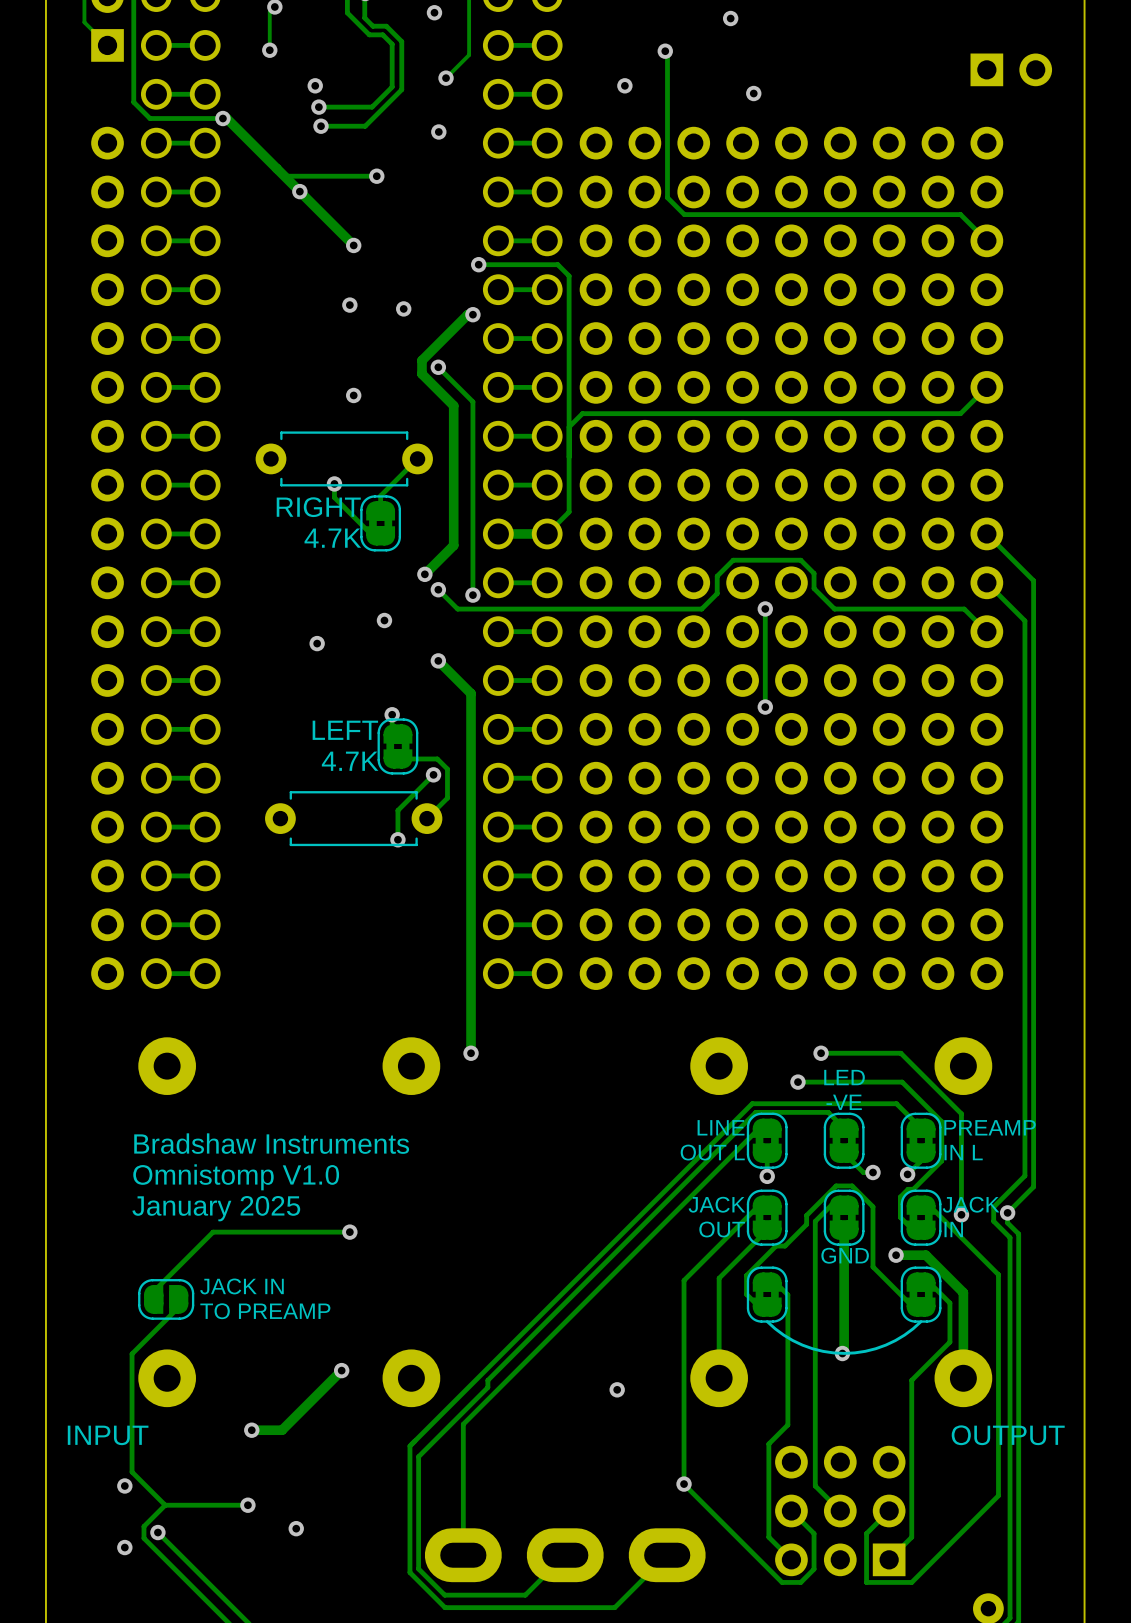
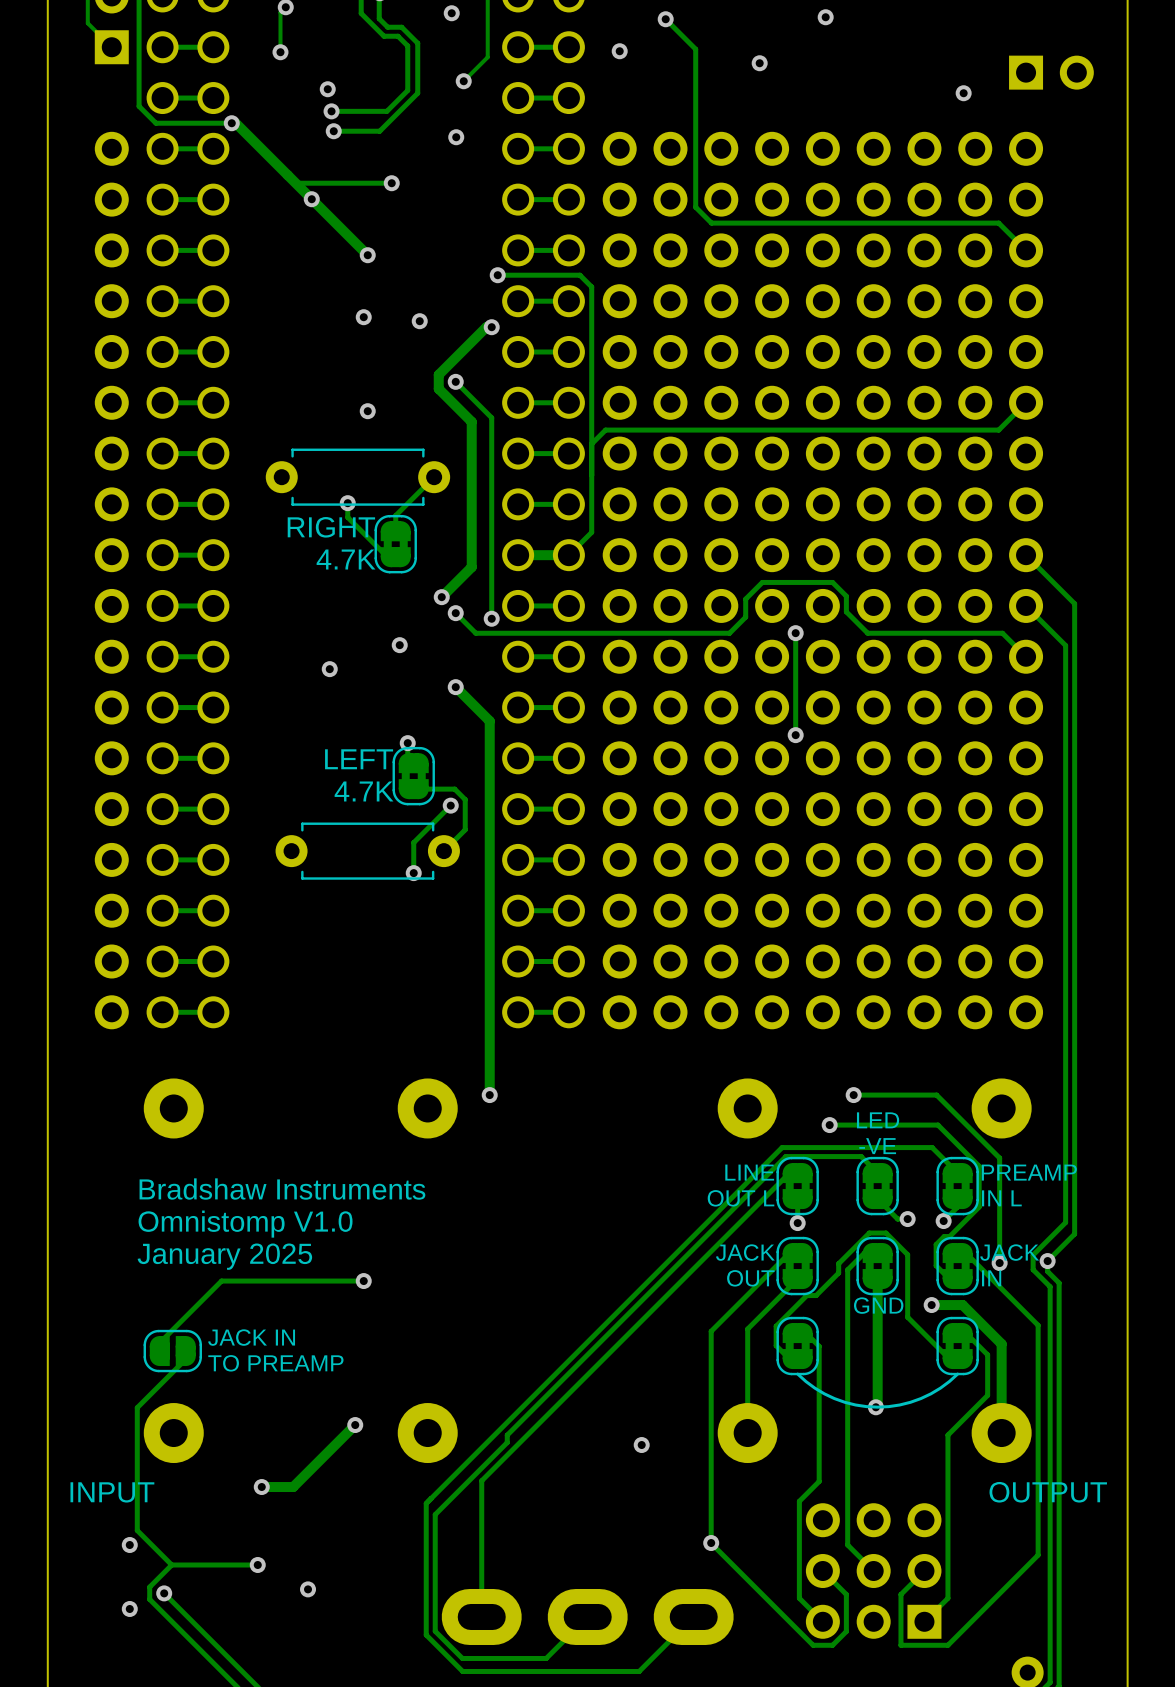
via: none -> (825, 17)
via: none -> (665, 19)
via: (730, 18) -> none
via: none -> (619, 51)
track: (665, 51) (667, 53) (667, 197) (669, 199) -> (665, 19) (695, 49) (695, 207)
via: (665, 51) -> none
via: none -> (759, 63)
via: (624, 85) -> none
via: none -> (963, 93)
via: (753, 93) -> none

